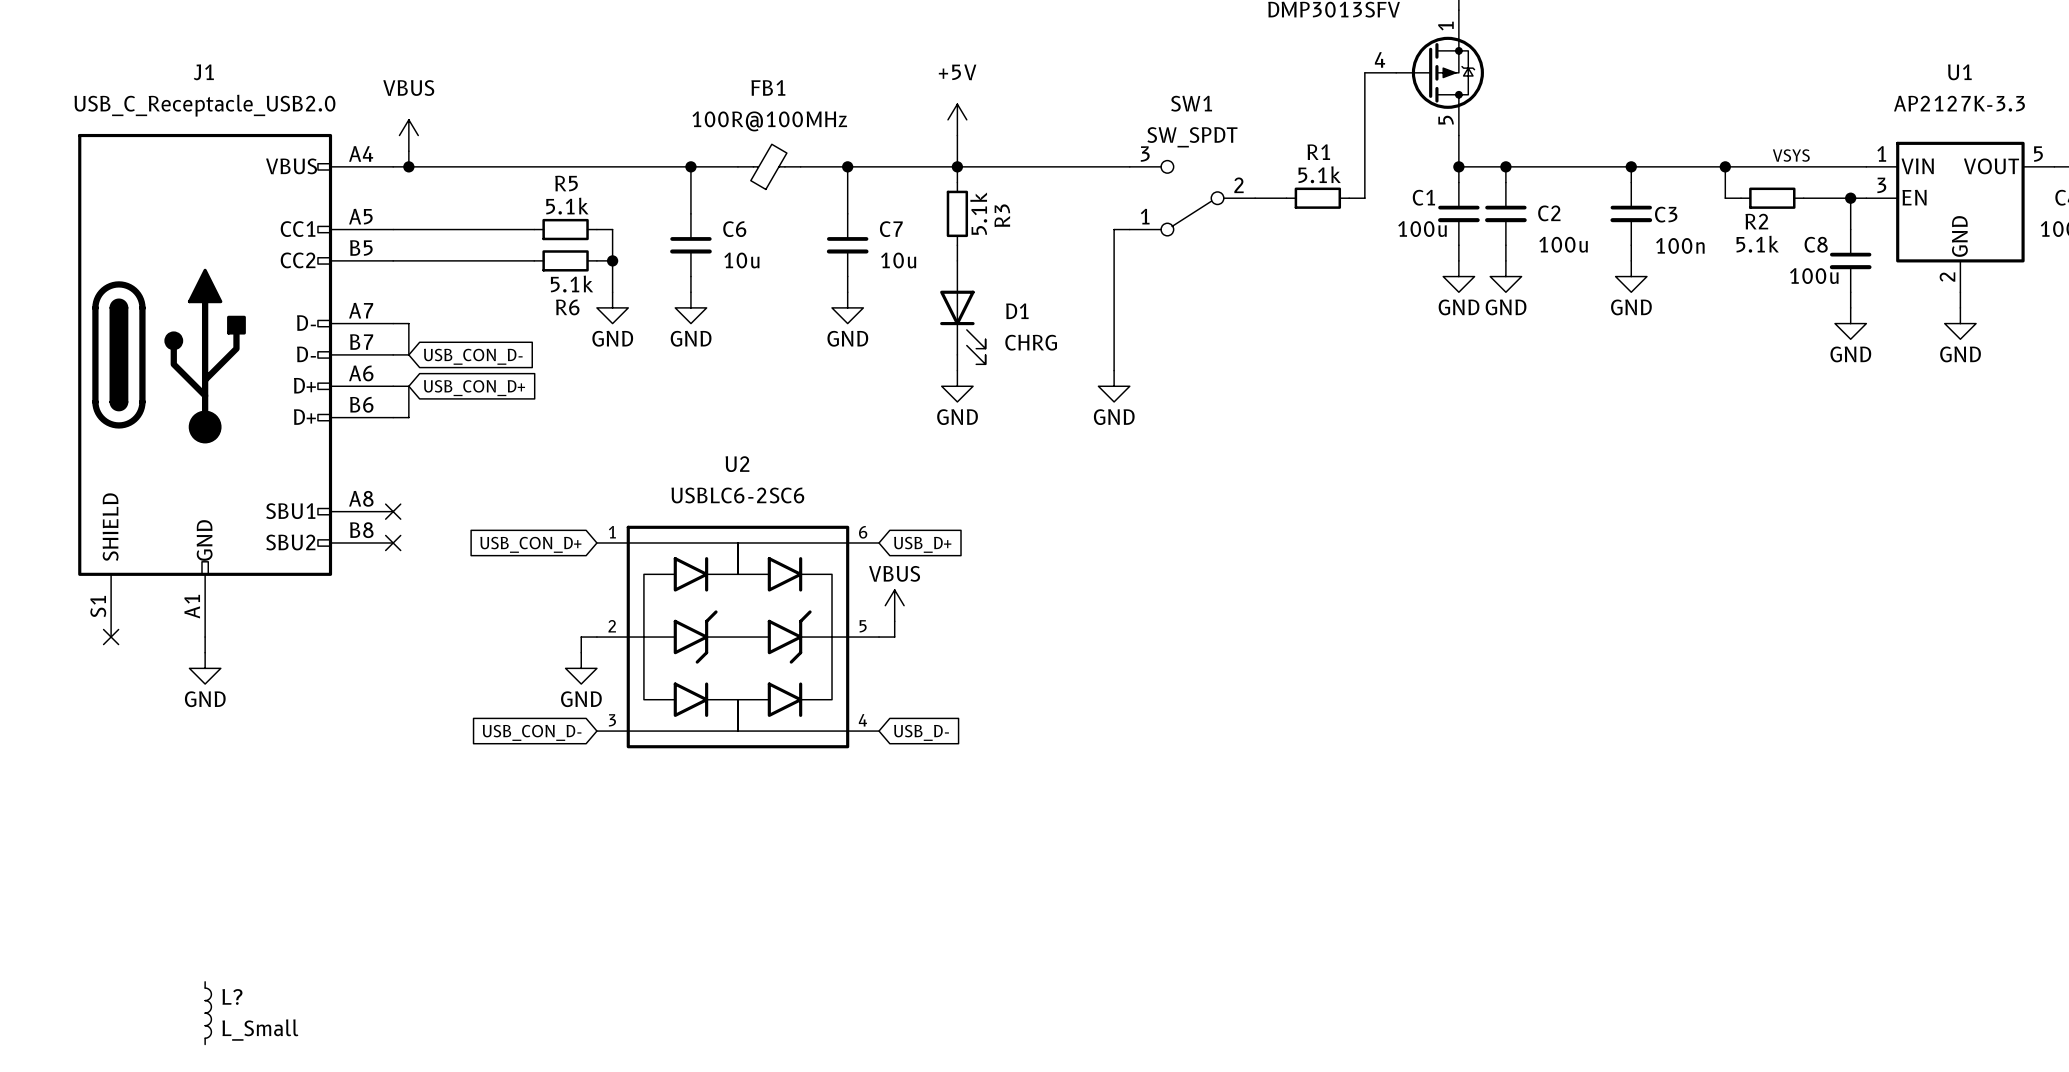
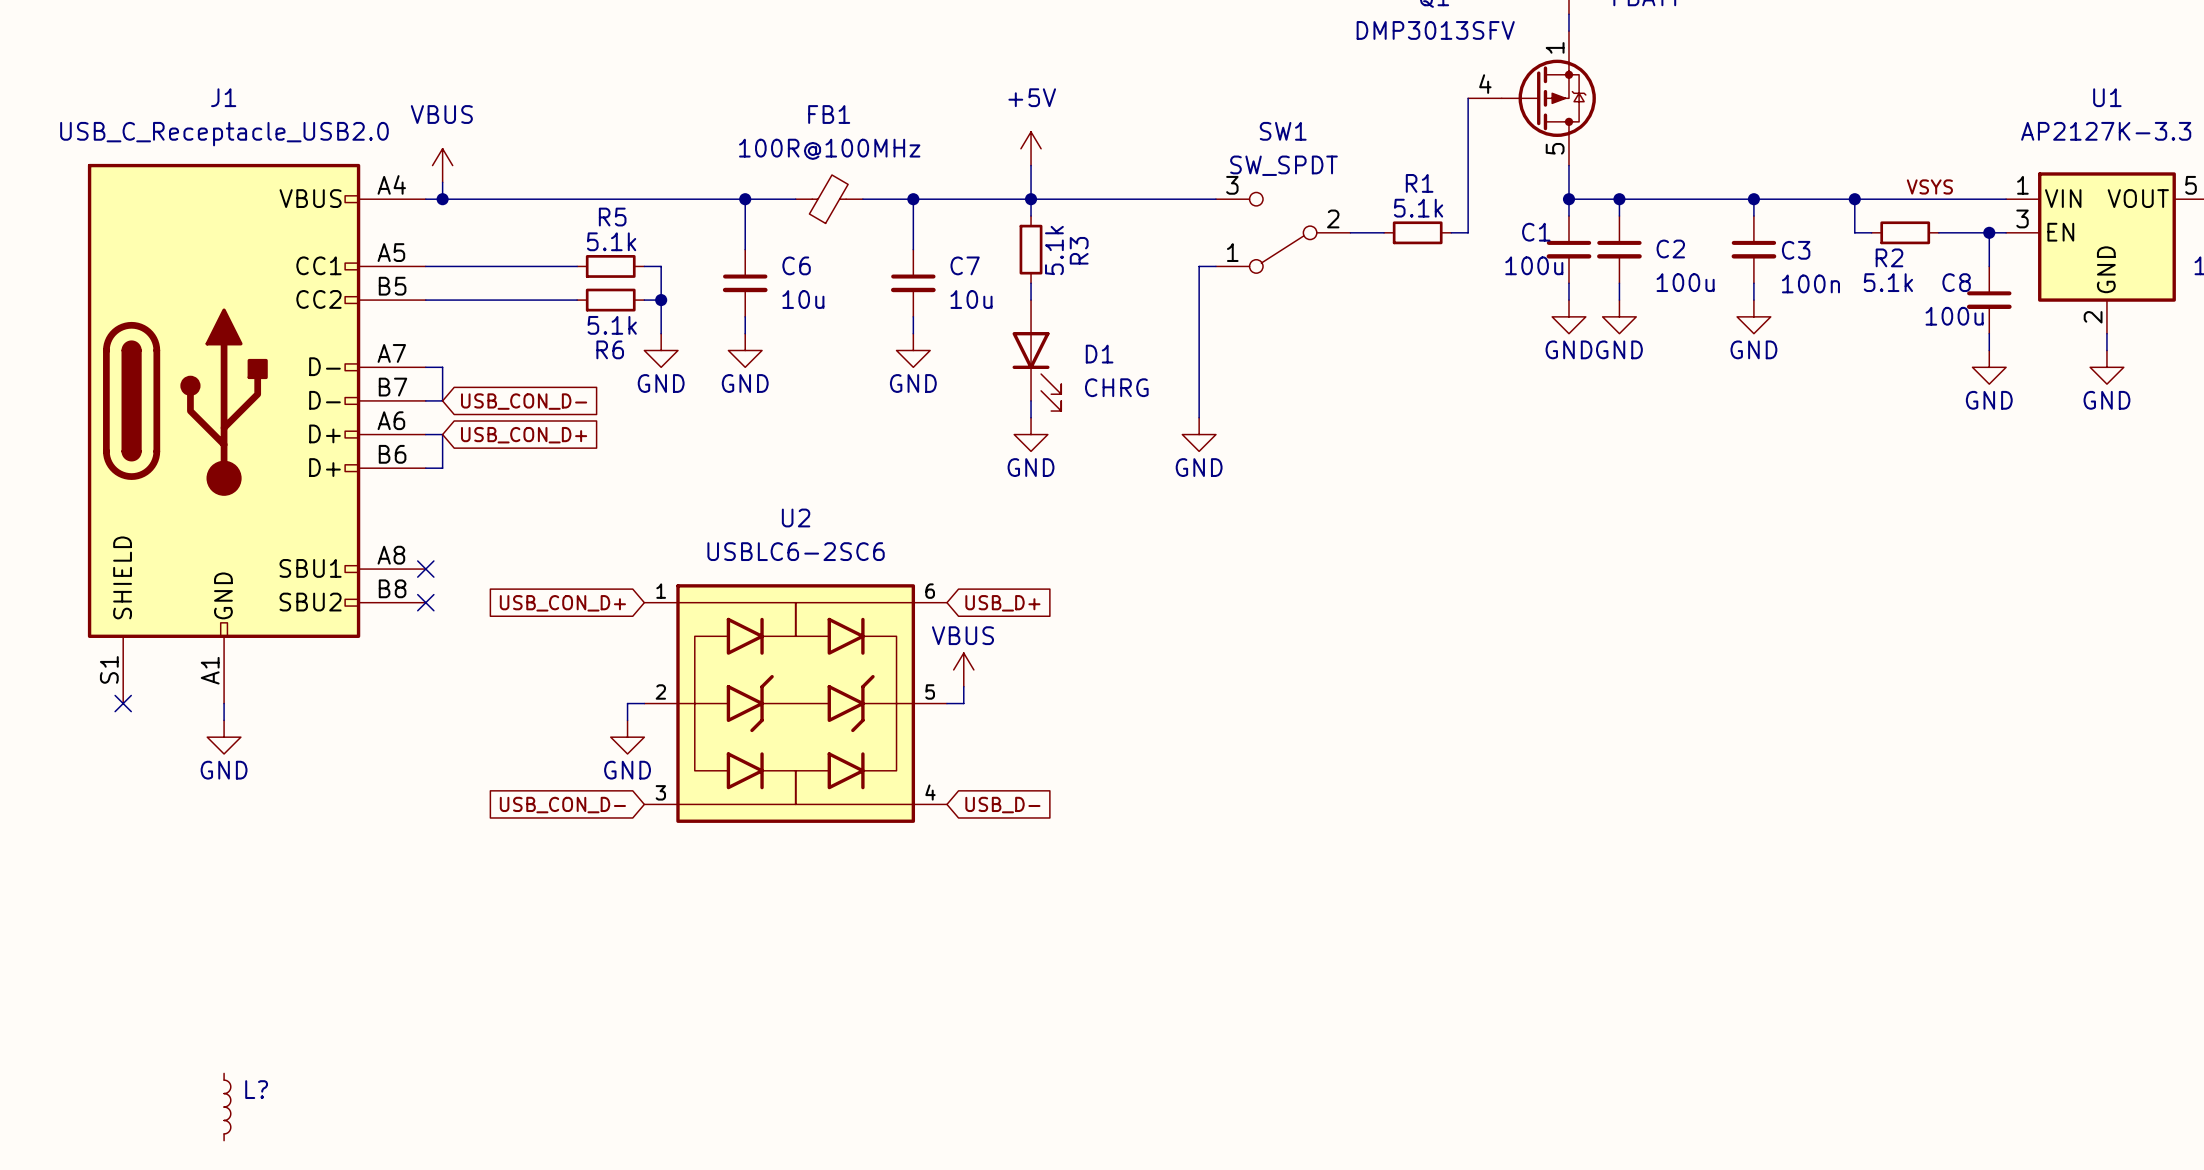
L? value: L_Small (260, 1030) -> none

